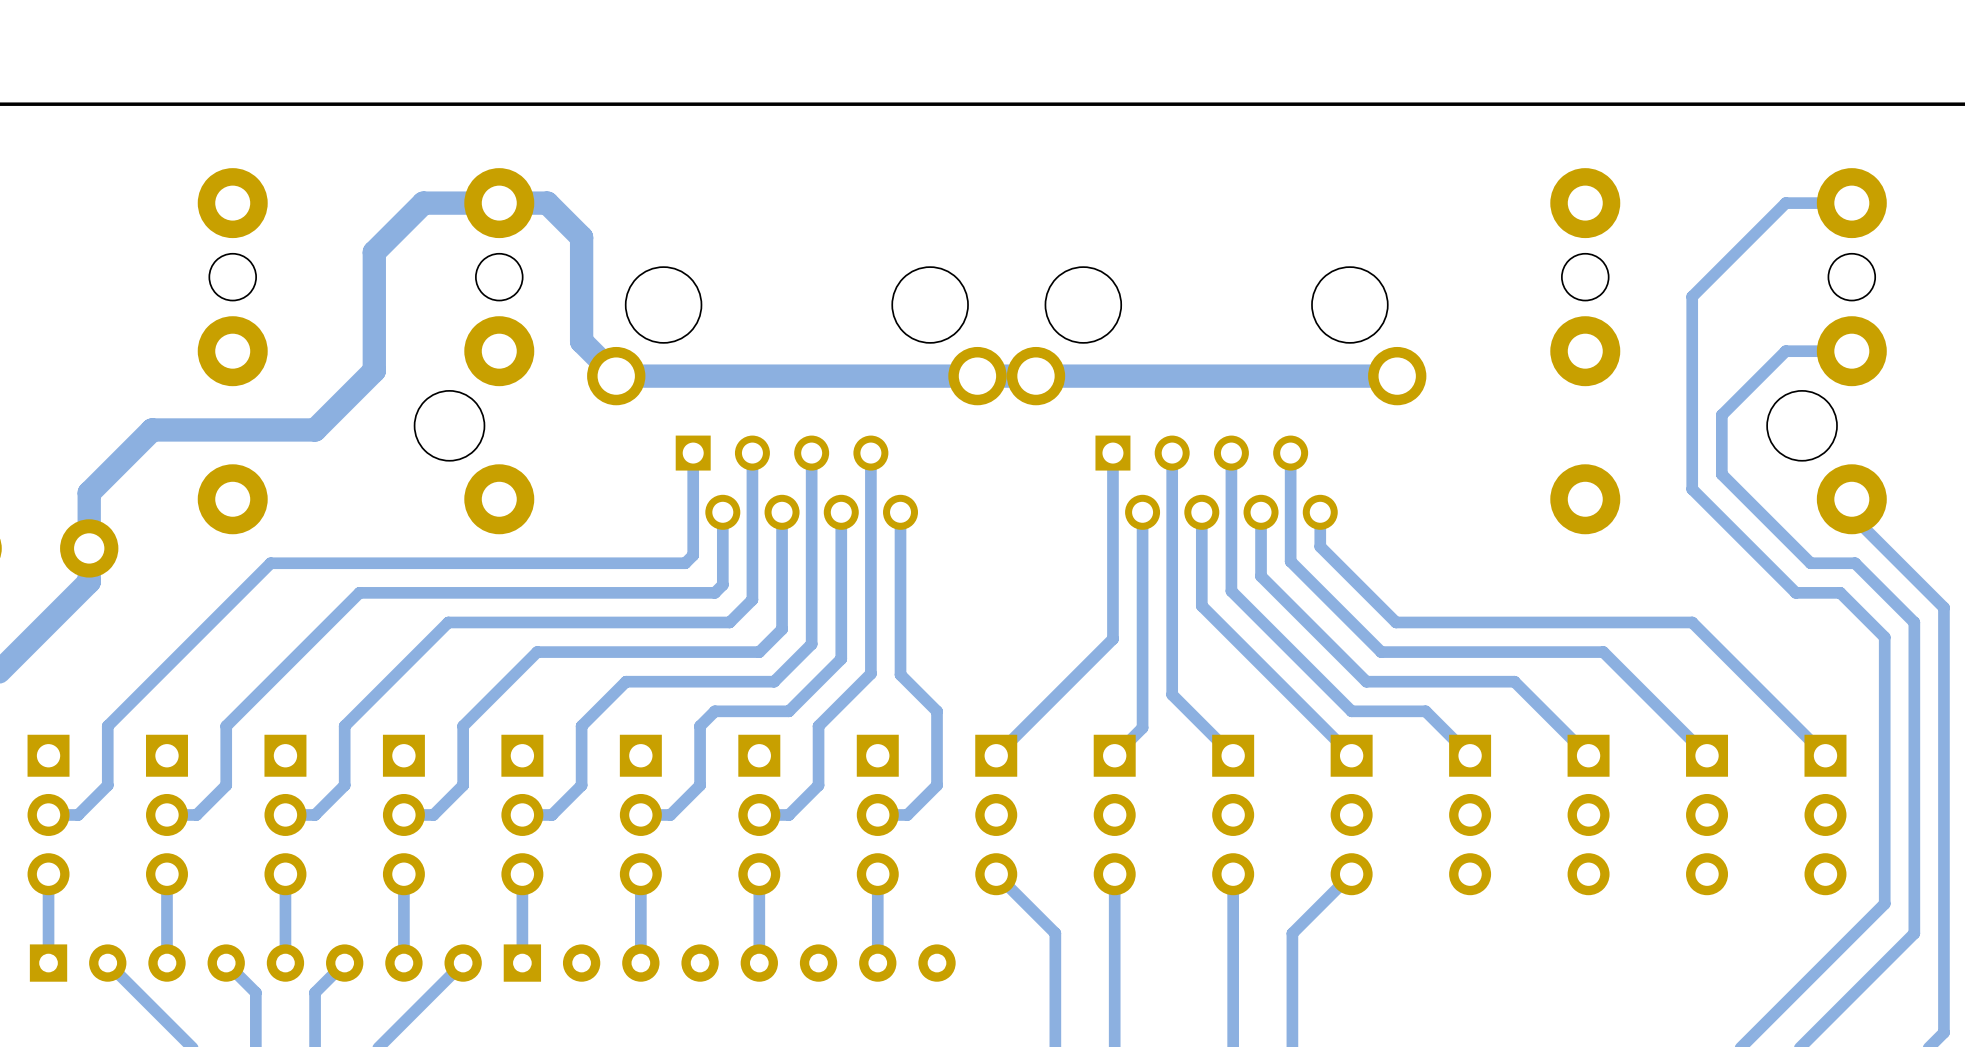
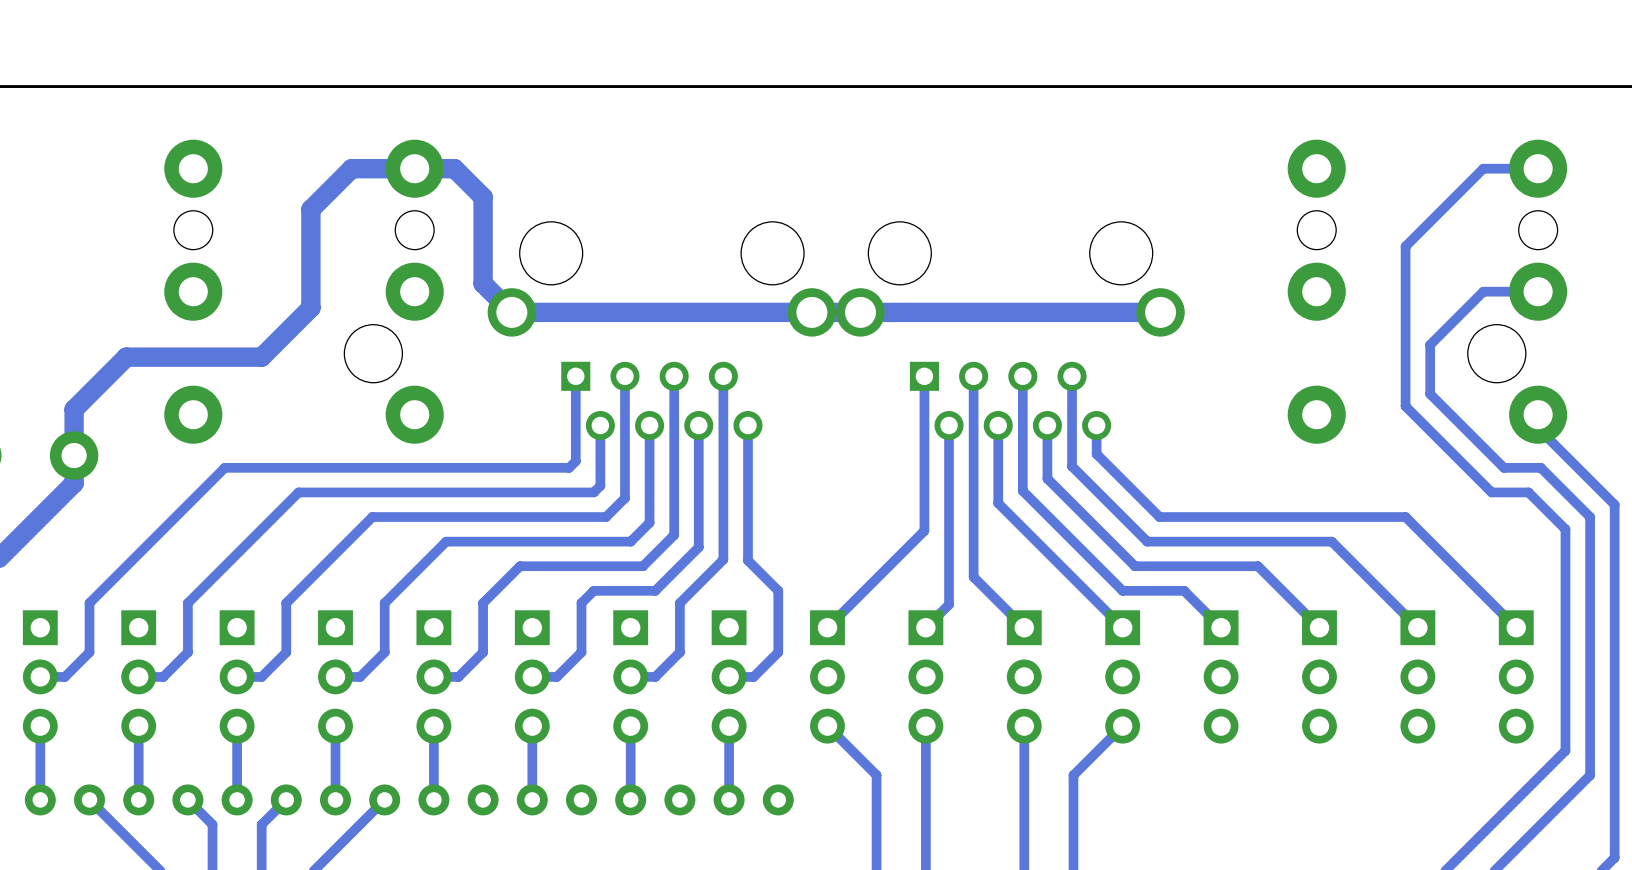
part: none -> (64, 799)
part: (255, 963) -> none
part: none -> (458, 799)
part: (729, 963) -> none

